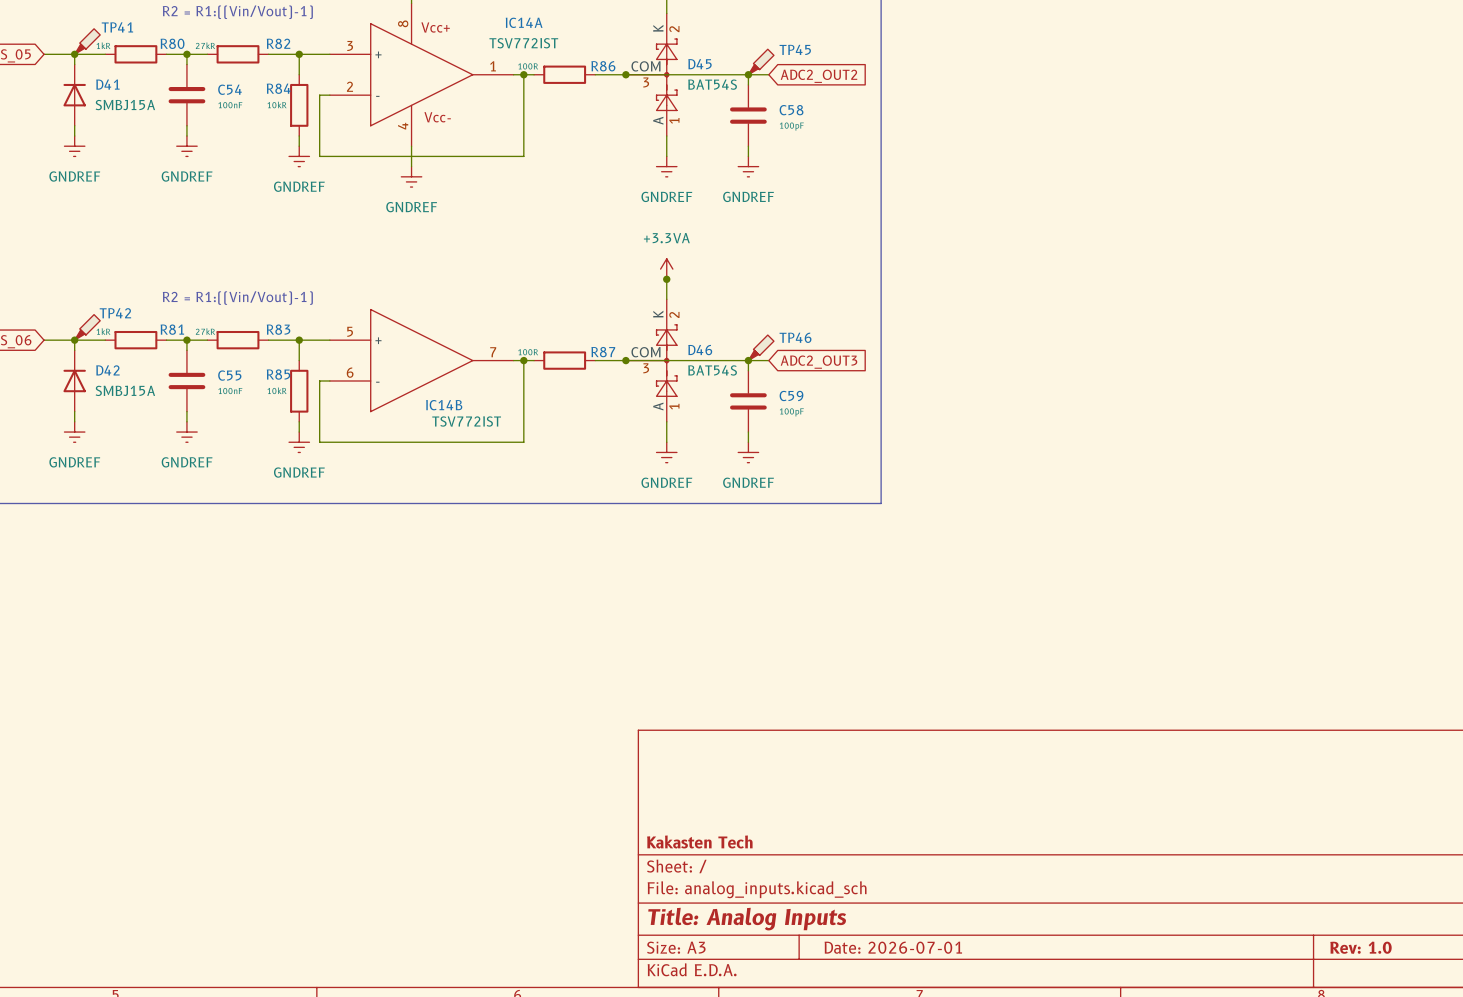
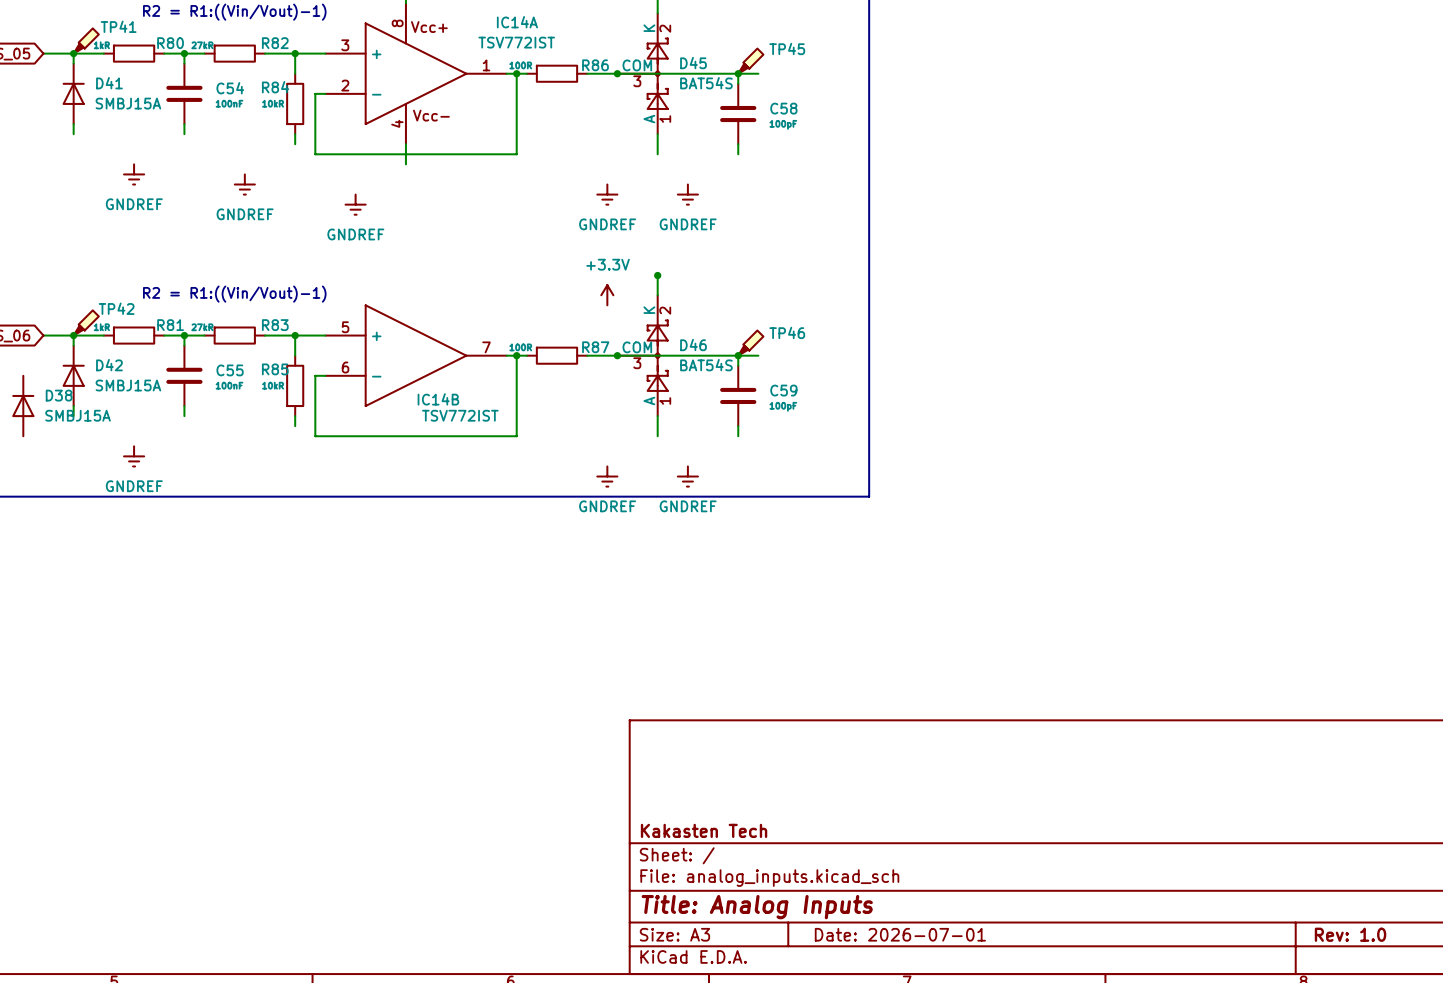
global label: ADC2_OUT2 (818, 76) -> none
power symbol: GNDREF (74, 146) -> none
power symbol: GNDREF (186, 146) -> none
power symbol: GNDREF (299, 156) -> none
power symbol: GNDREF (666, 166) -> none
power symbol: GNDREF (748, 166) -> none
power symbol: none -> GNDREF (134, 174)
power symbol: GNDREF (411, 176) -> none
power symbol: none -> GNDREF (244, 184)
power symbol: none -> GNDREF (607, 194)
power symbol: none -> GNDREF (687, 194)
power symbol: none -> GNDREF (355, 204)
power symbol: +3.3VA (666, 269) -> none
power symbol: none -> +3.3V (607, 295)
global label: ADC2_OUT3 (818, 362) -> none
D38: none -> SMBJ15A (23, 406)
power symbol: GNDREF (74, 432) -> none
power symbol: GNDREF (186, 432) -> none
power symbol: GNDREF (299, 442) -> none
power symbol: GNDREF (666, 452) -> none
power symbol: GNDREF (748, 452) -> none
power symbol: none -> GNDREF (134, 456)
power symbol: none -> GNDREF (607, 476)
power symbol: none -> GNDREF (687, 476)

